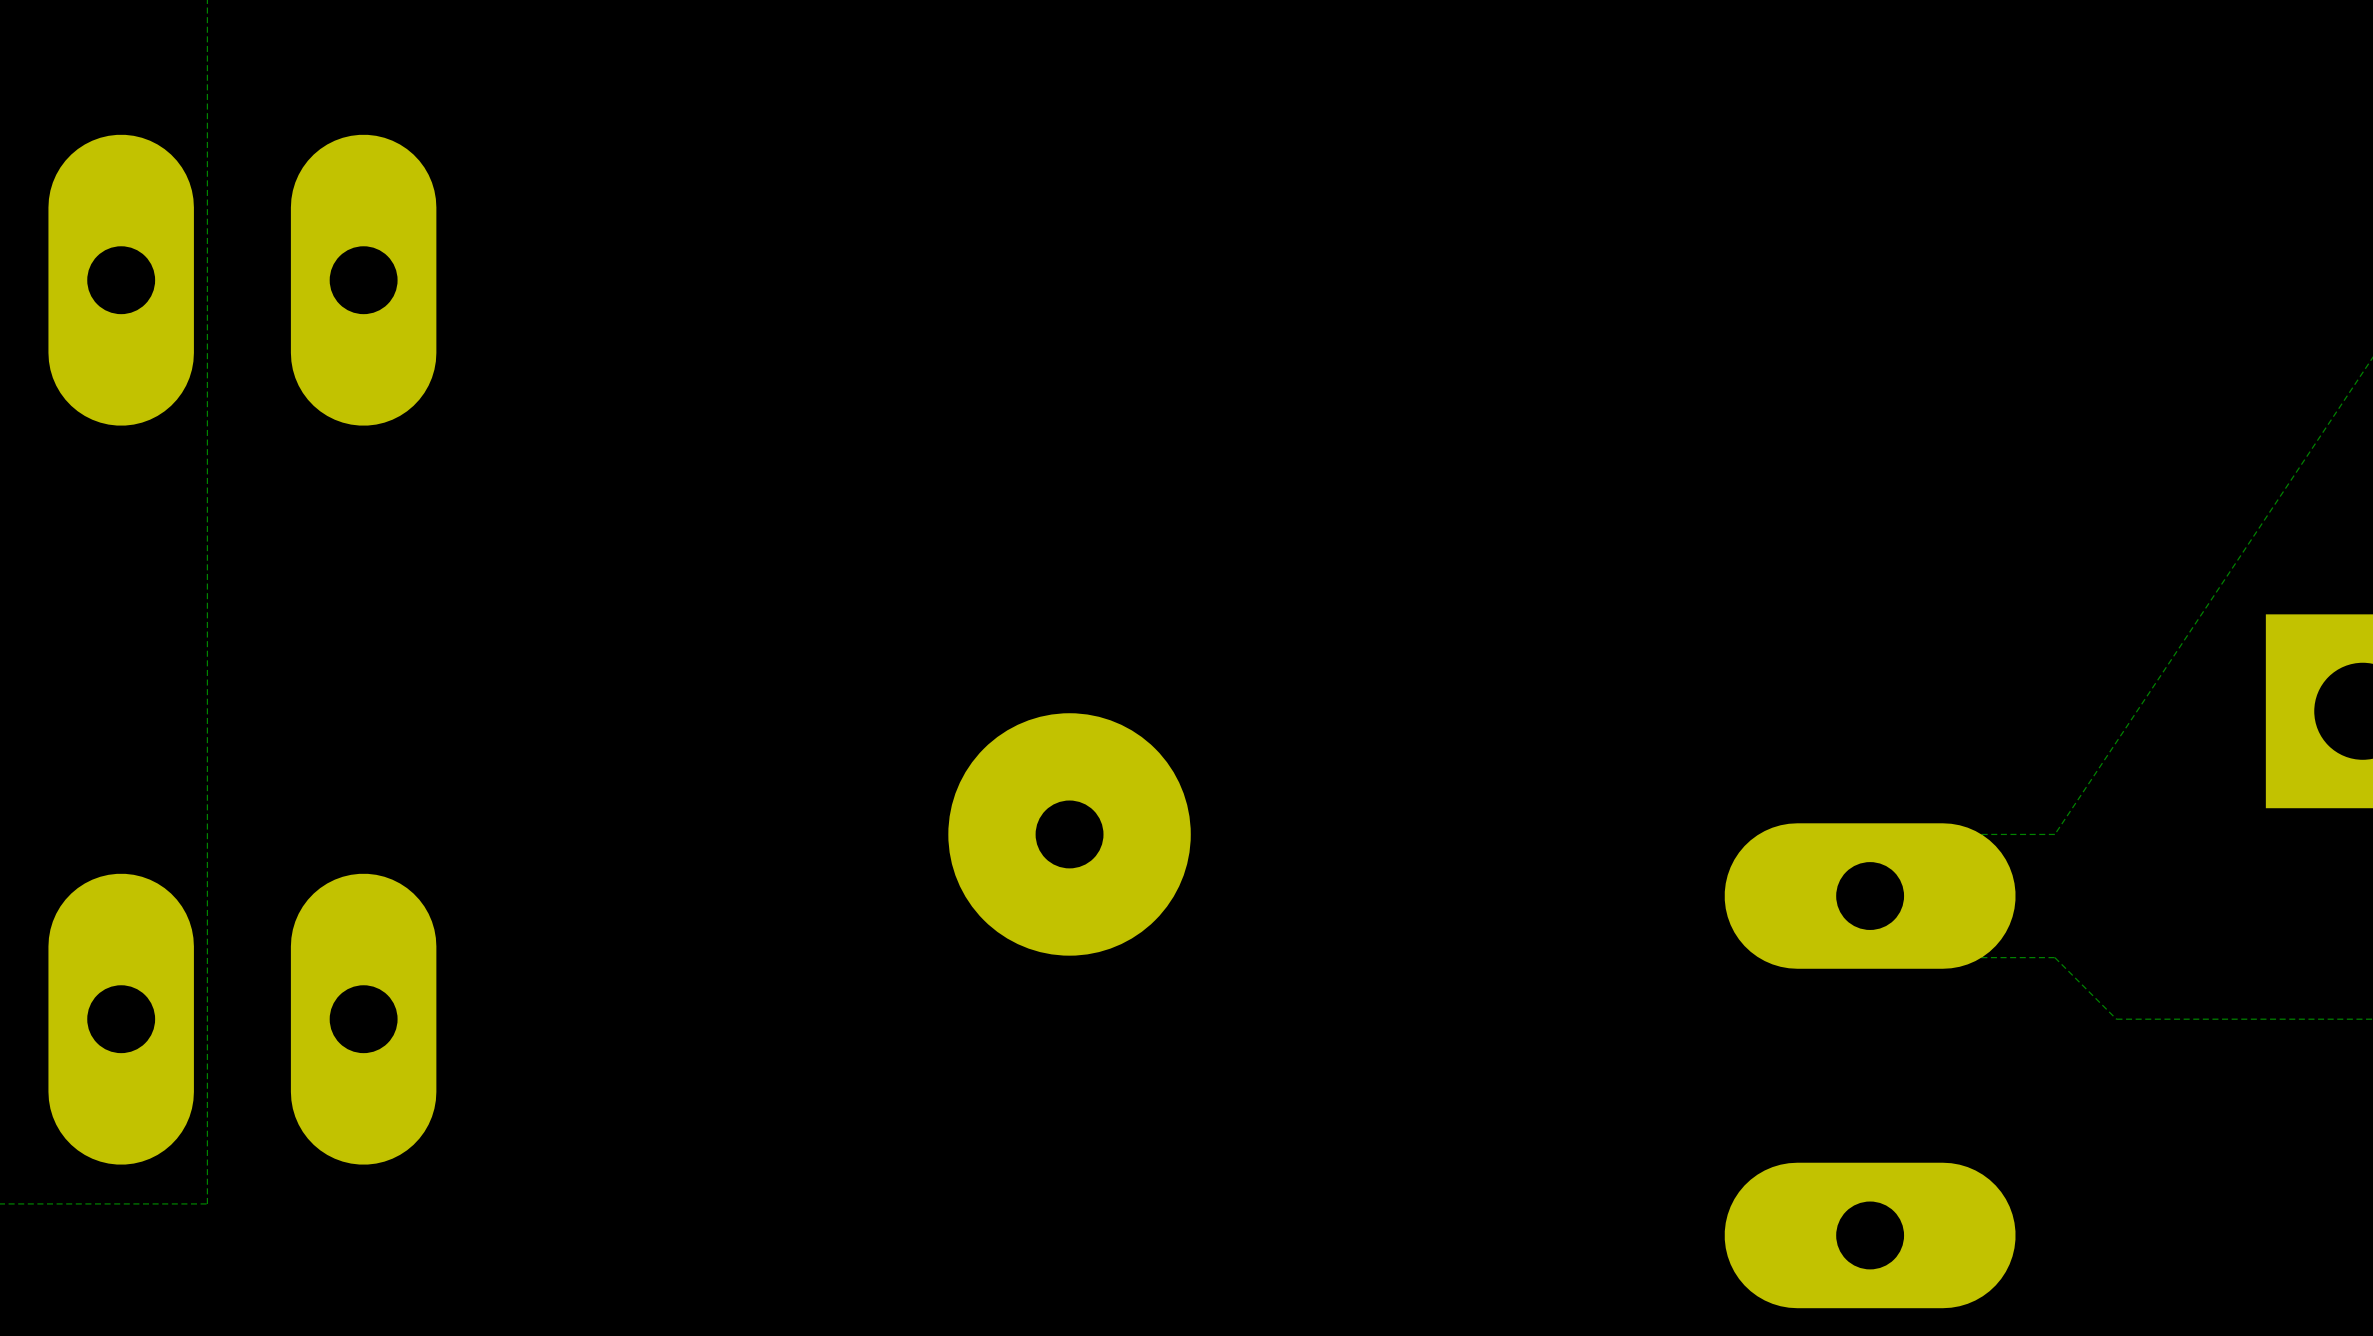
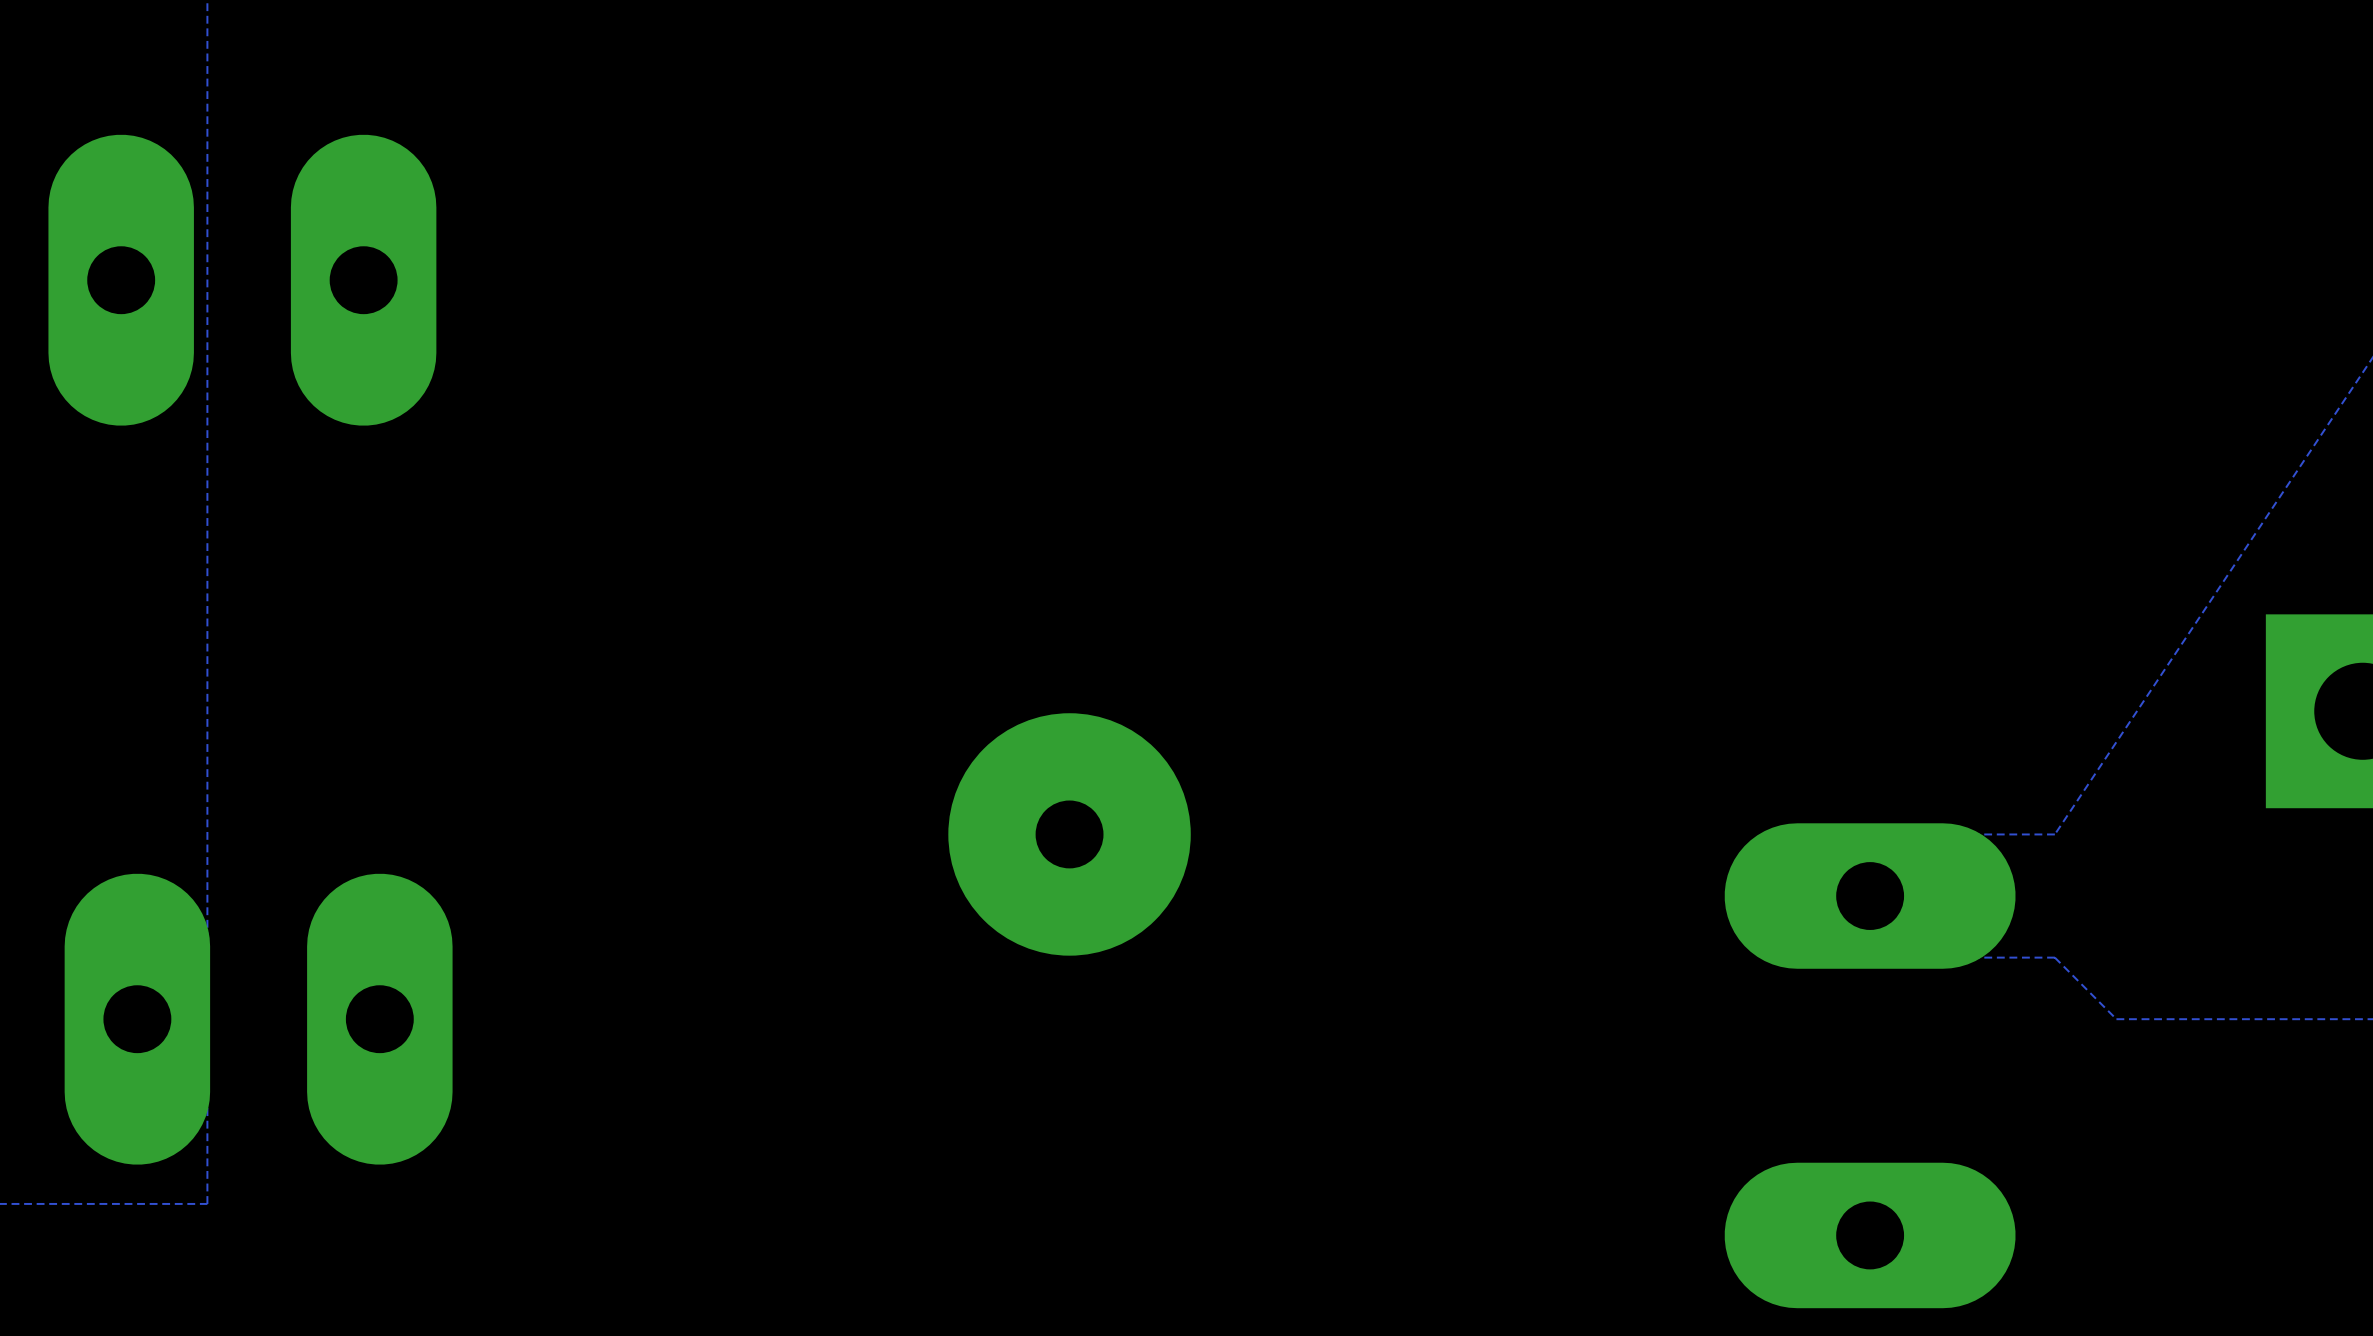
part position: (242, 1019) -> (258, 1019)

